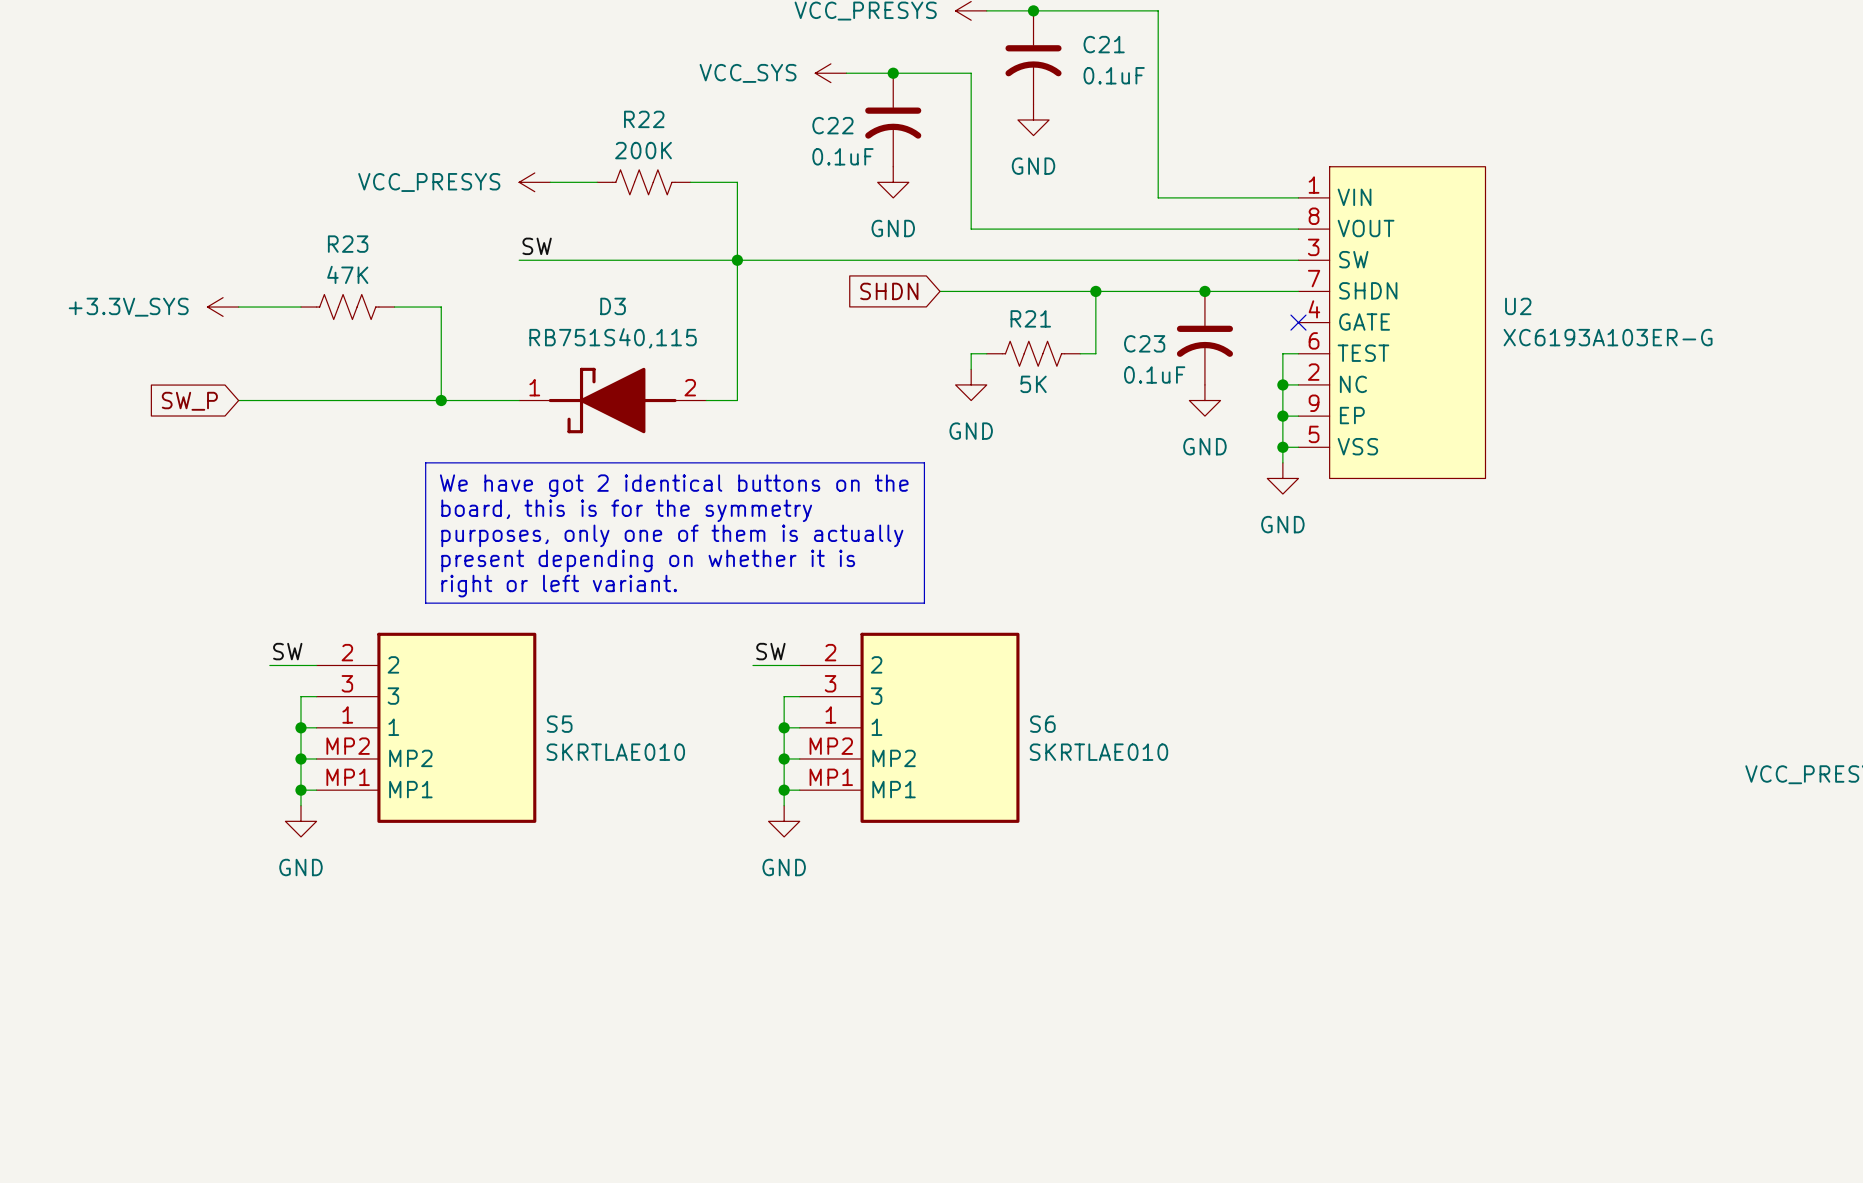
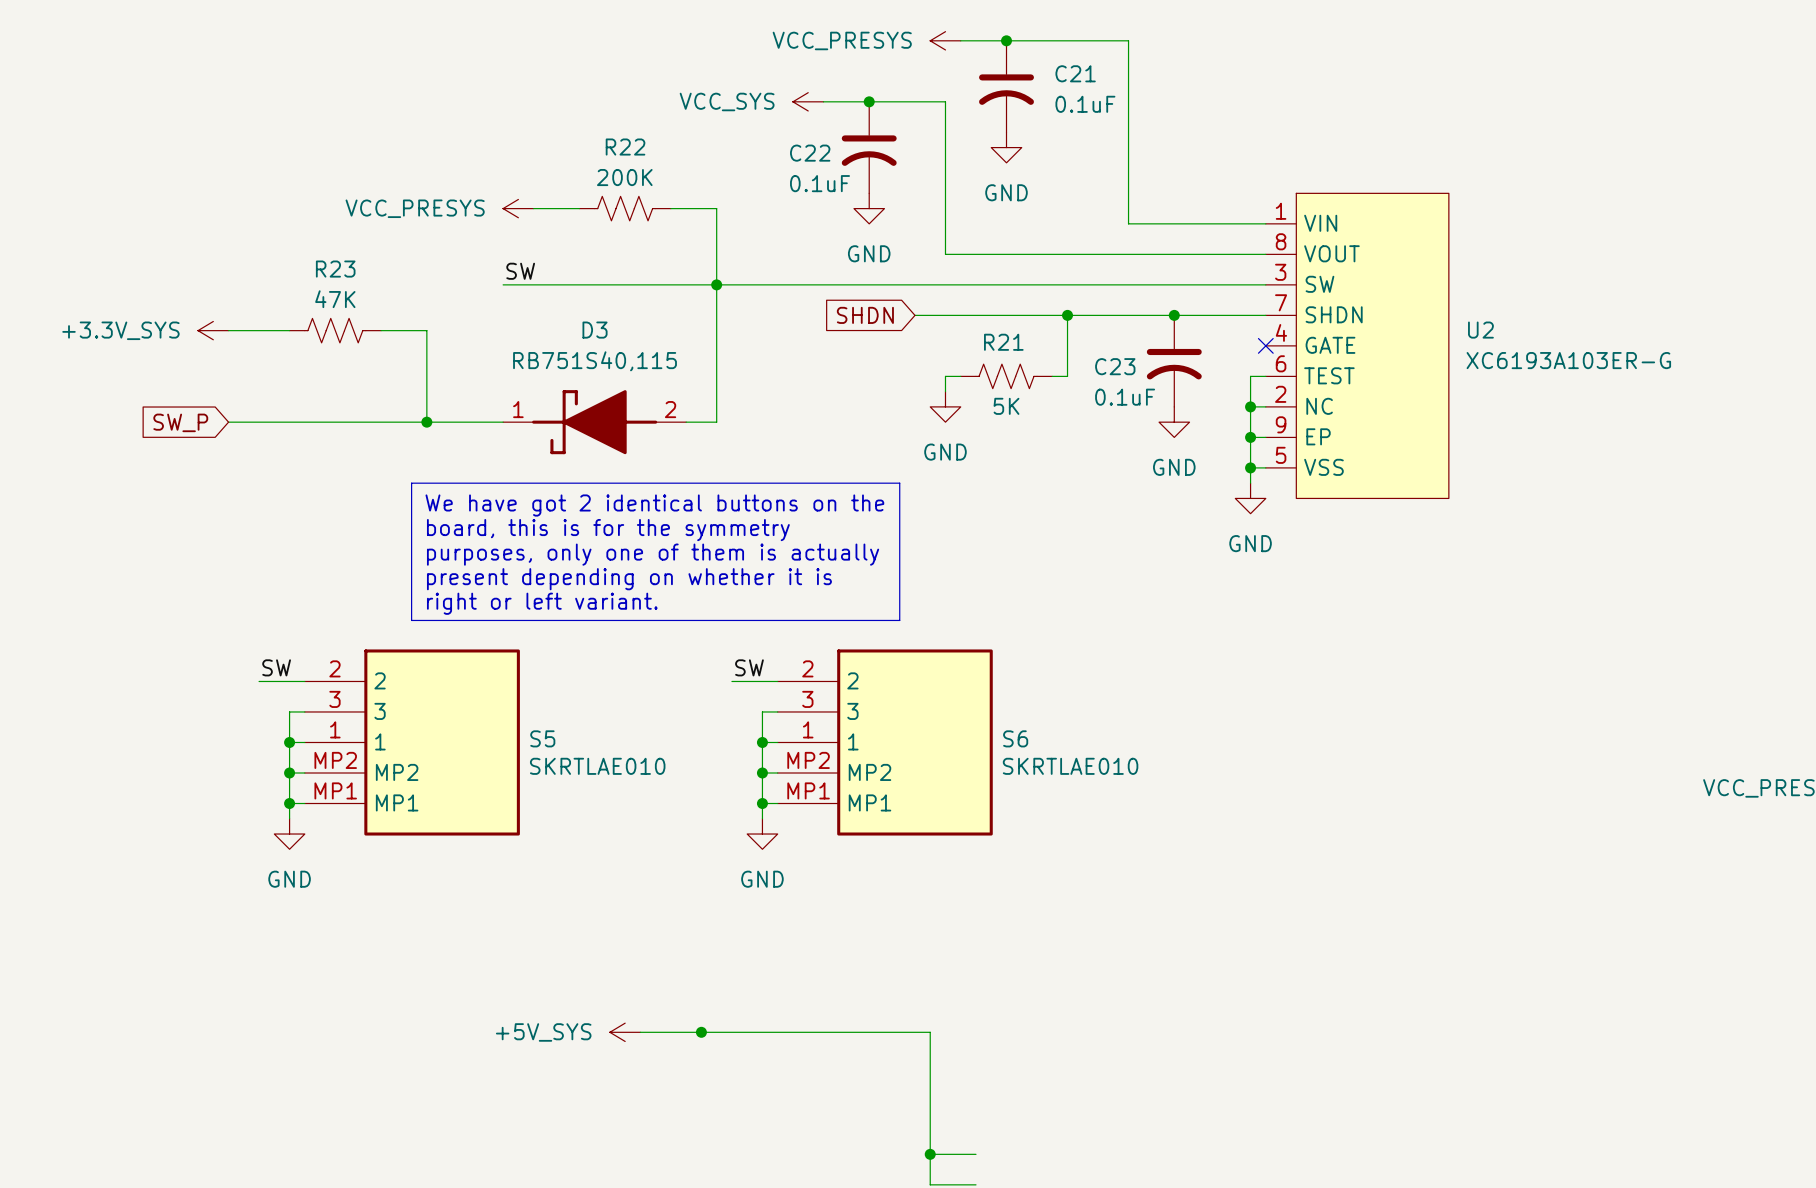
power symbol: none -> +5V_SYS (625, 1032)
wire: none -> (640, 1032) (930, 1032) (930, 1184) (975, 1184)
junction: none -> (701, 1032)
wire: none -> (930, 1154) (975, 1154)
junction: none -> (930, 1154)

